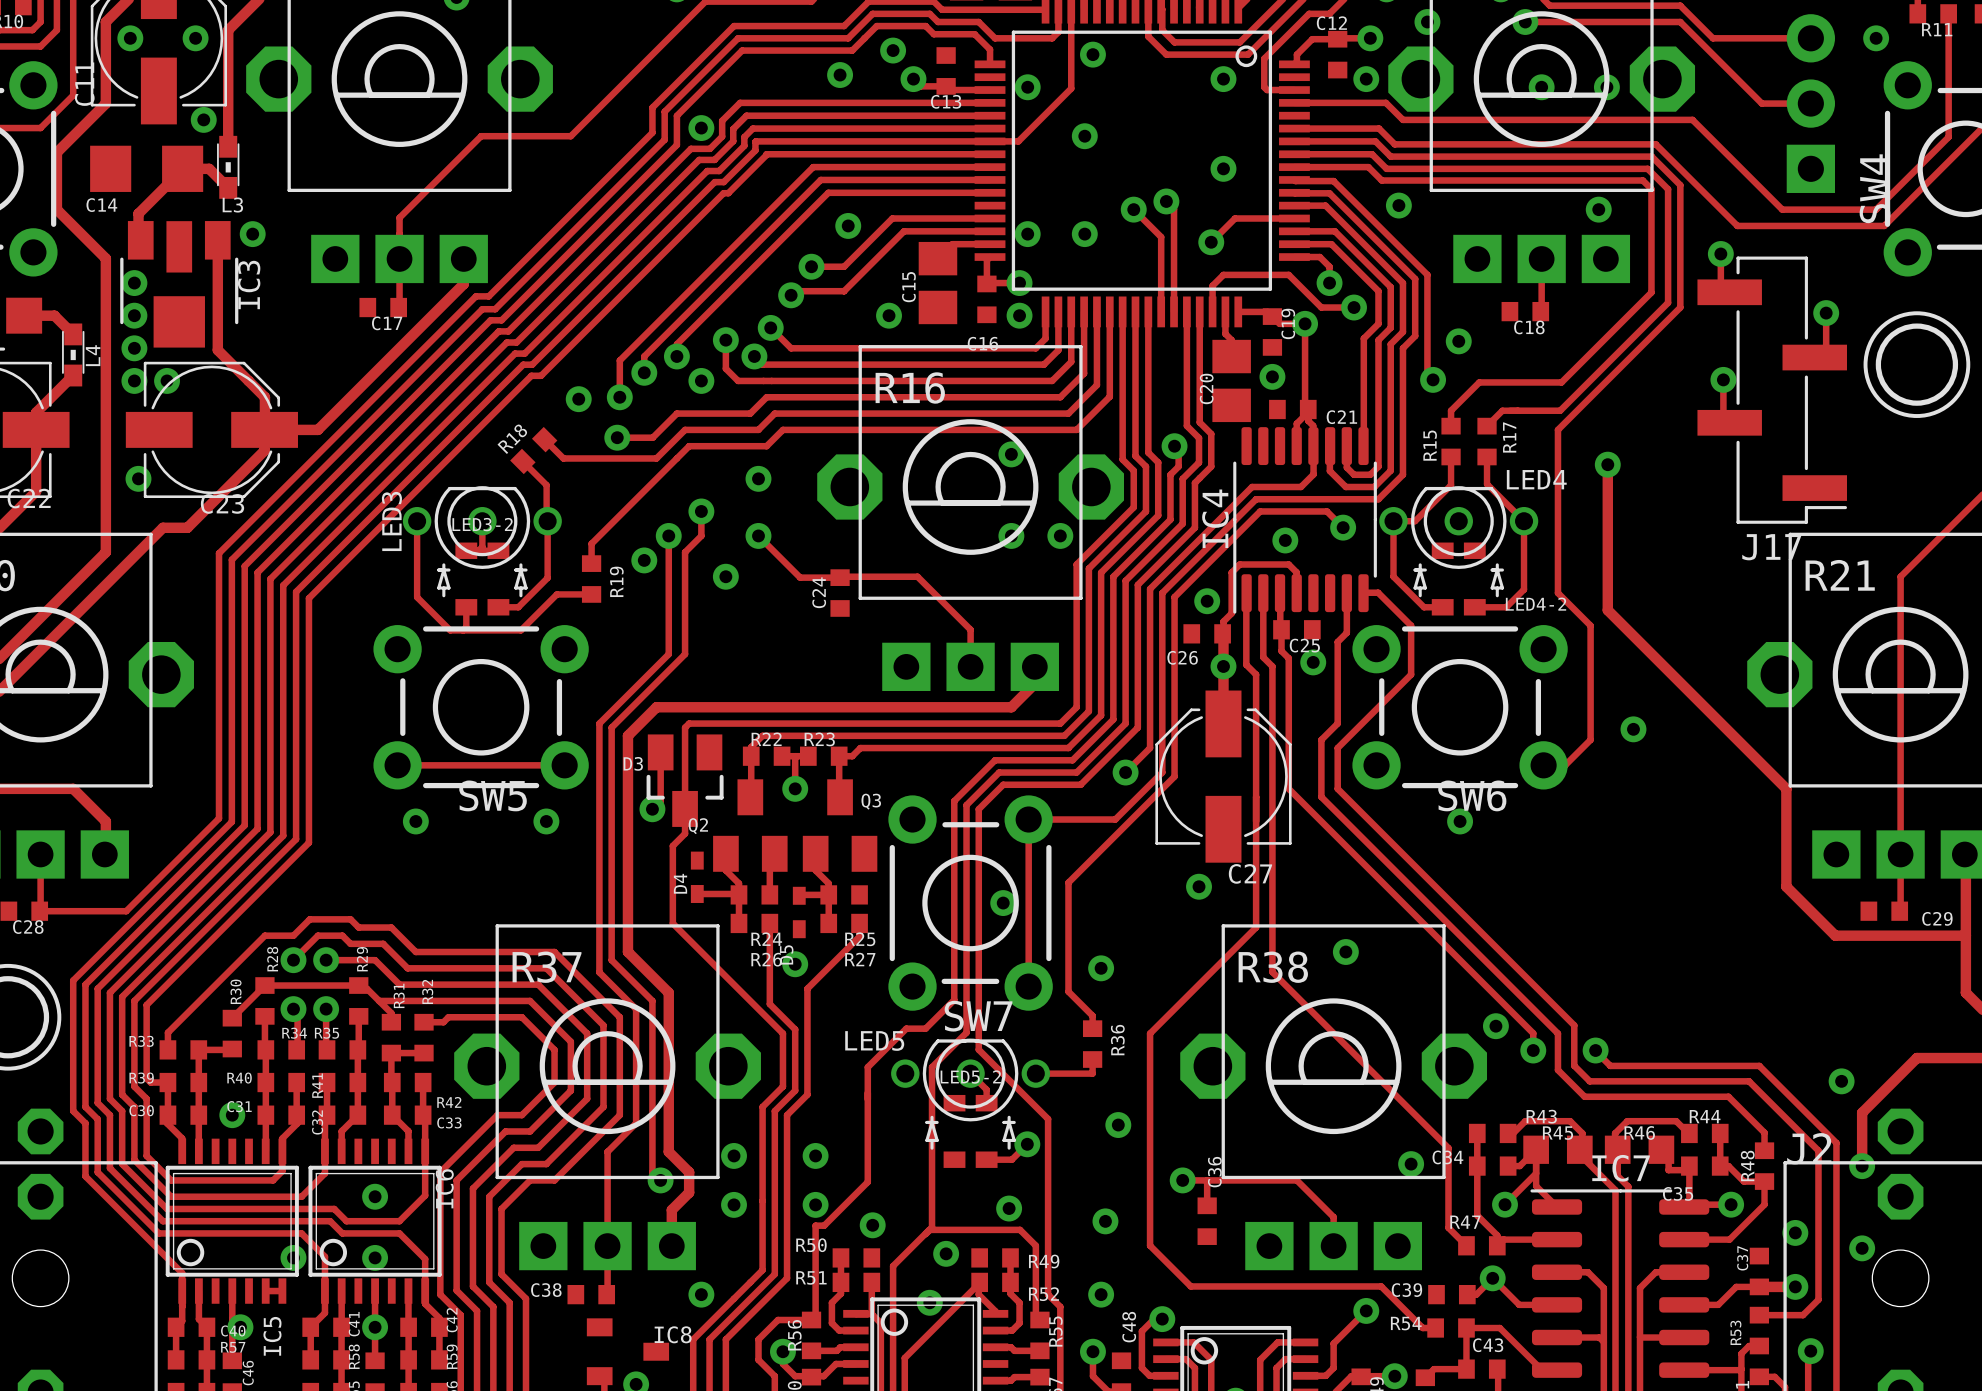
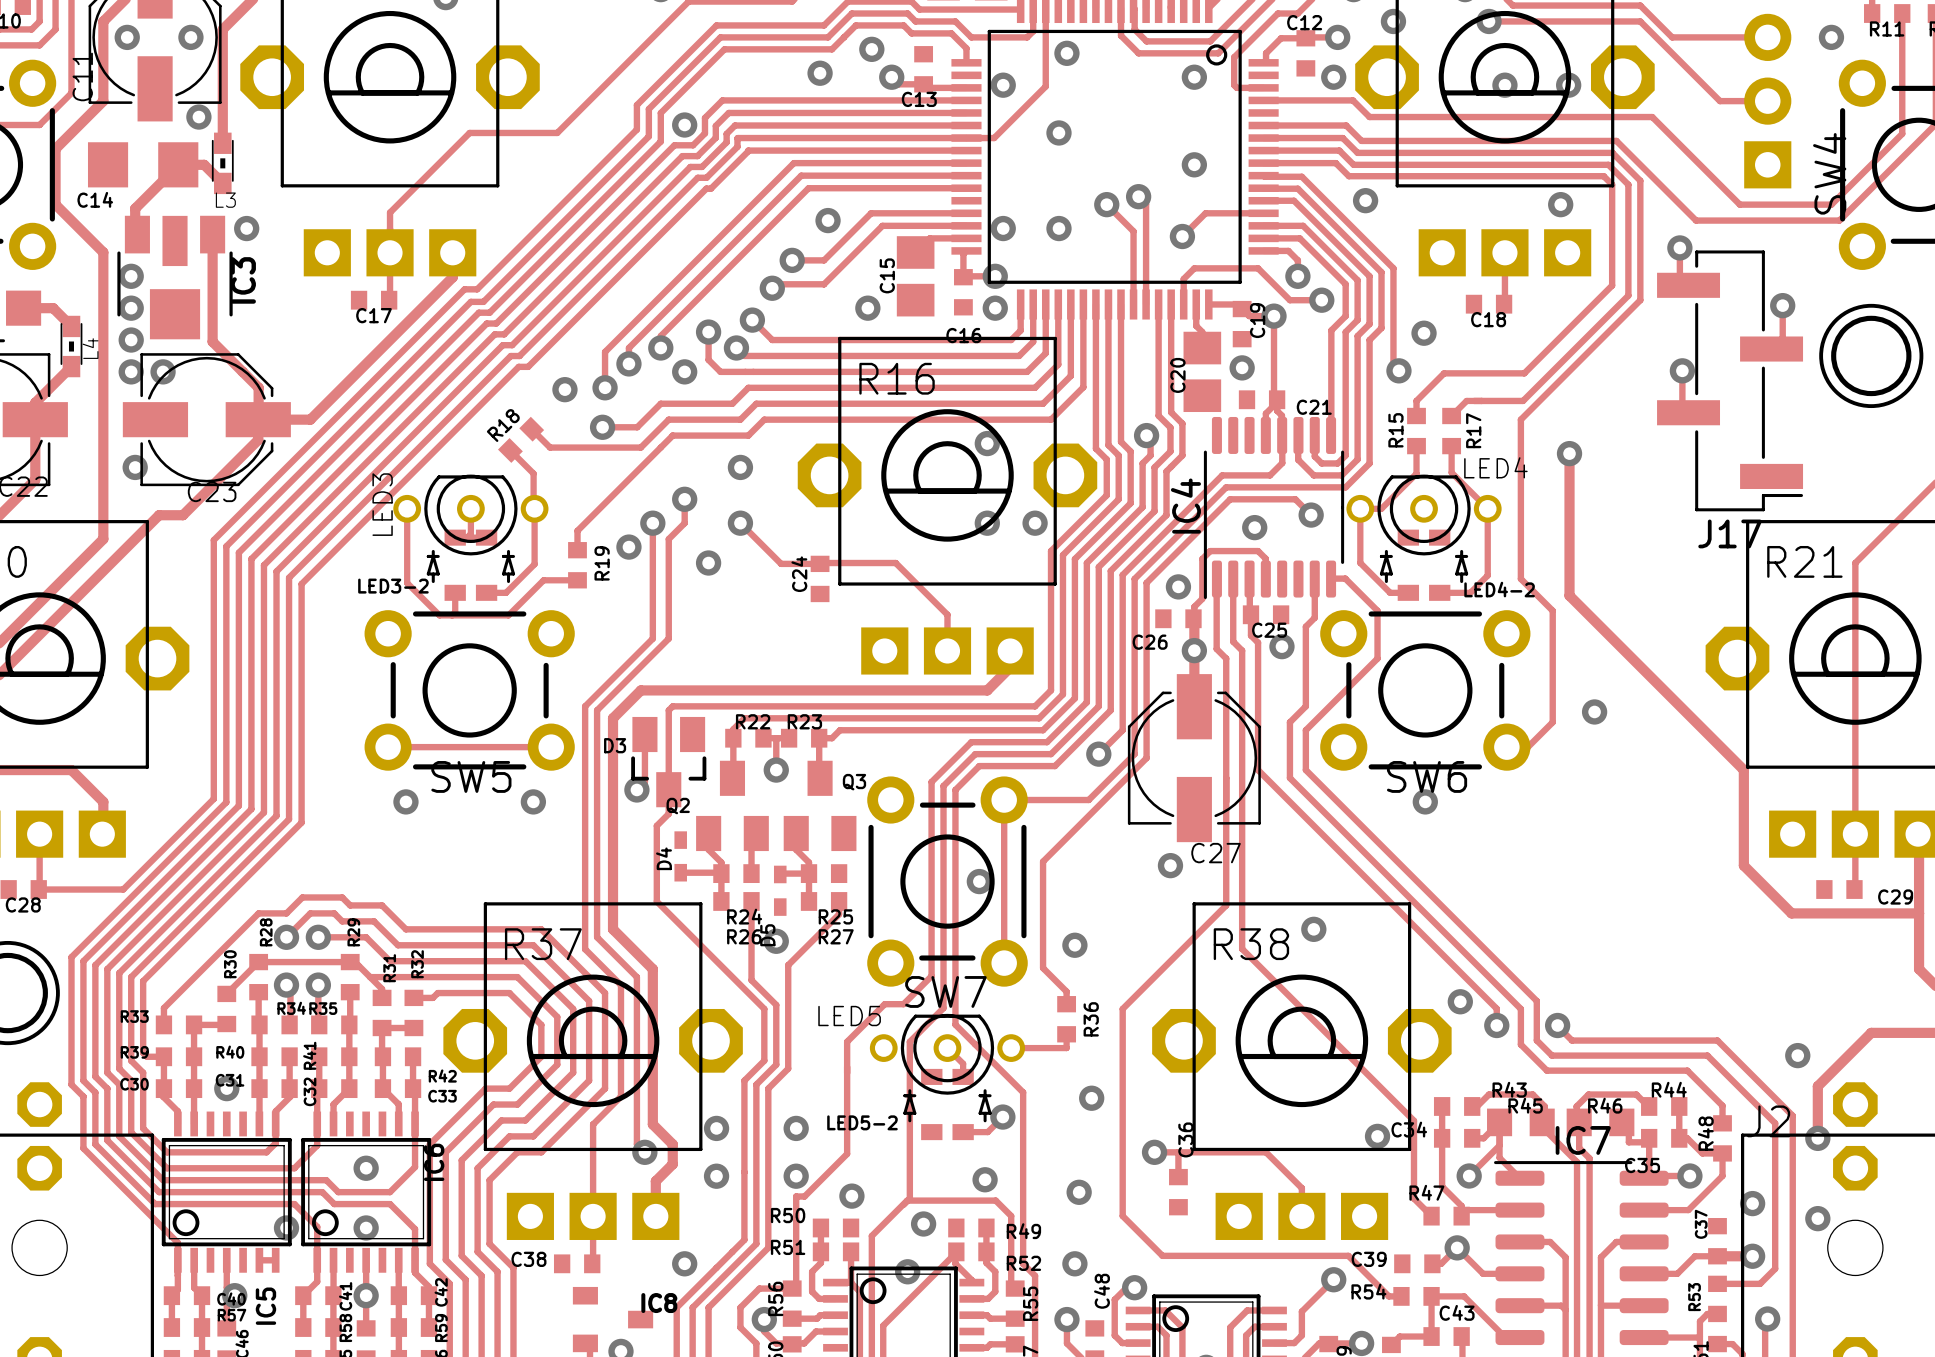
LED3-2 name position: LED3-2 (482, 524) -> LED3-2 (393, 586)
LED5-2 name position: LED5-2 (970, 1077) -> LED5-2 (862, 1122)

